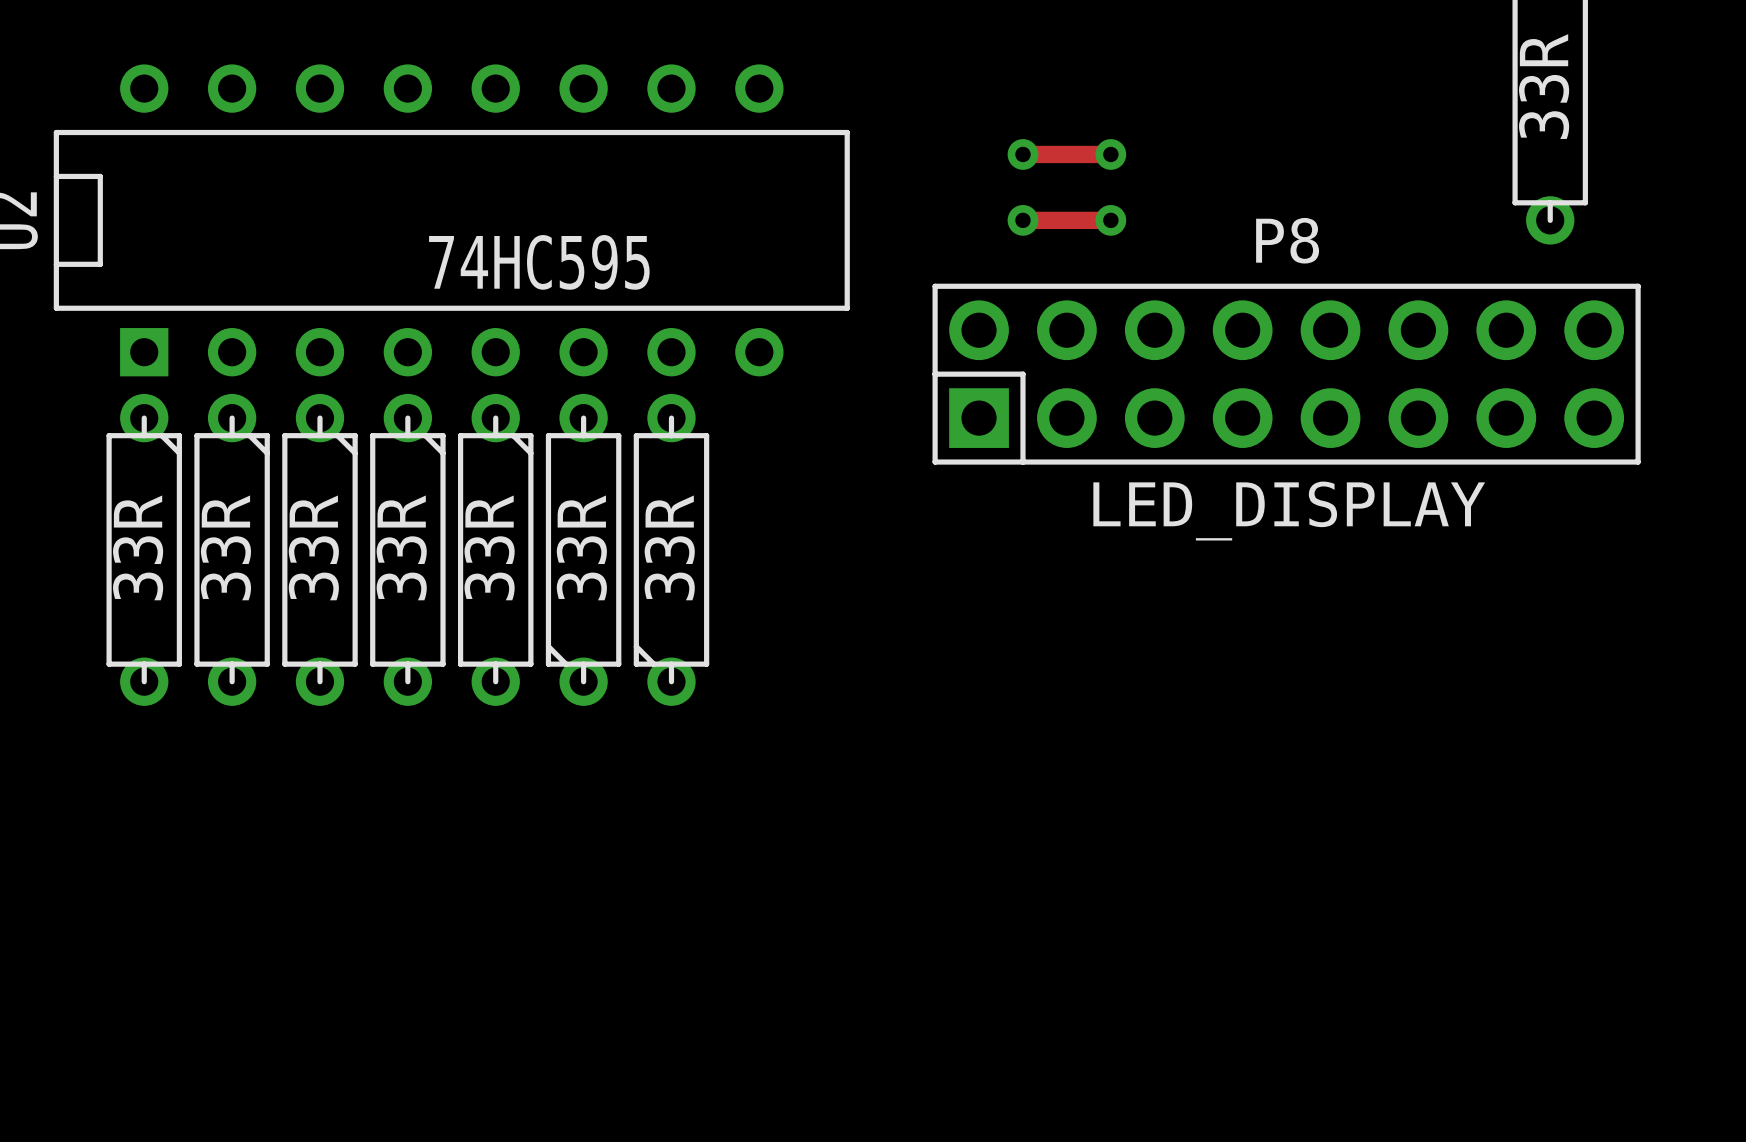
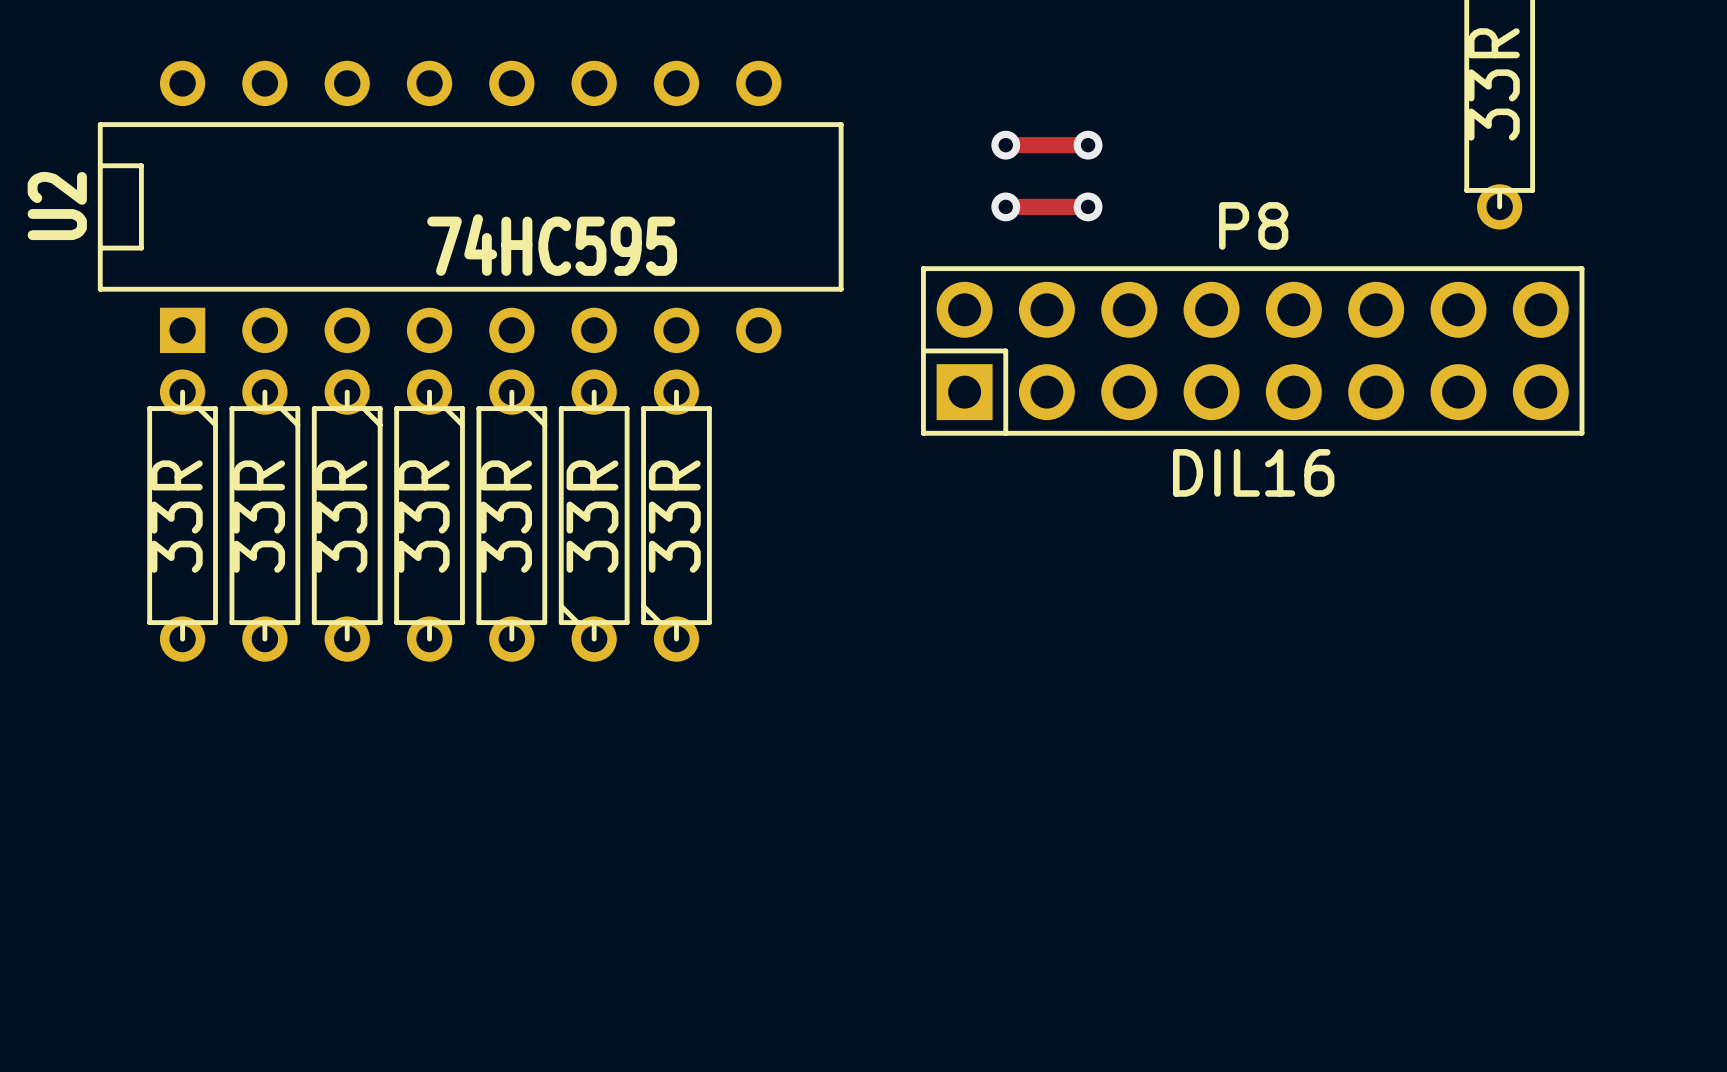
P8 value: LED_DISPLAY (1289, 511) -> DIL16 (1253, 472)

